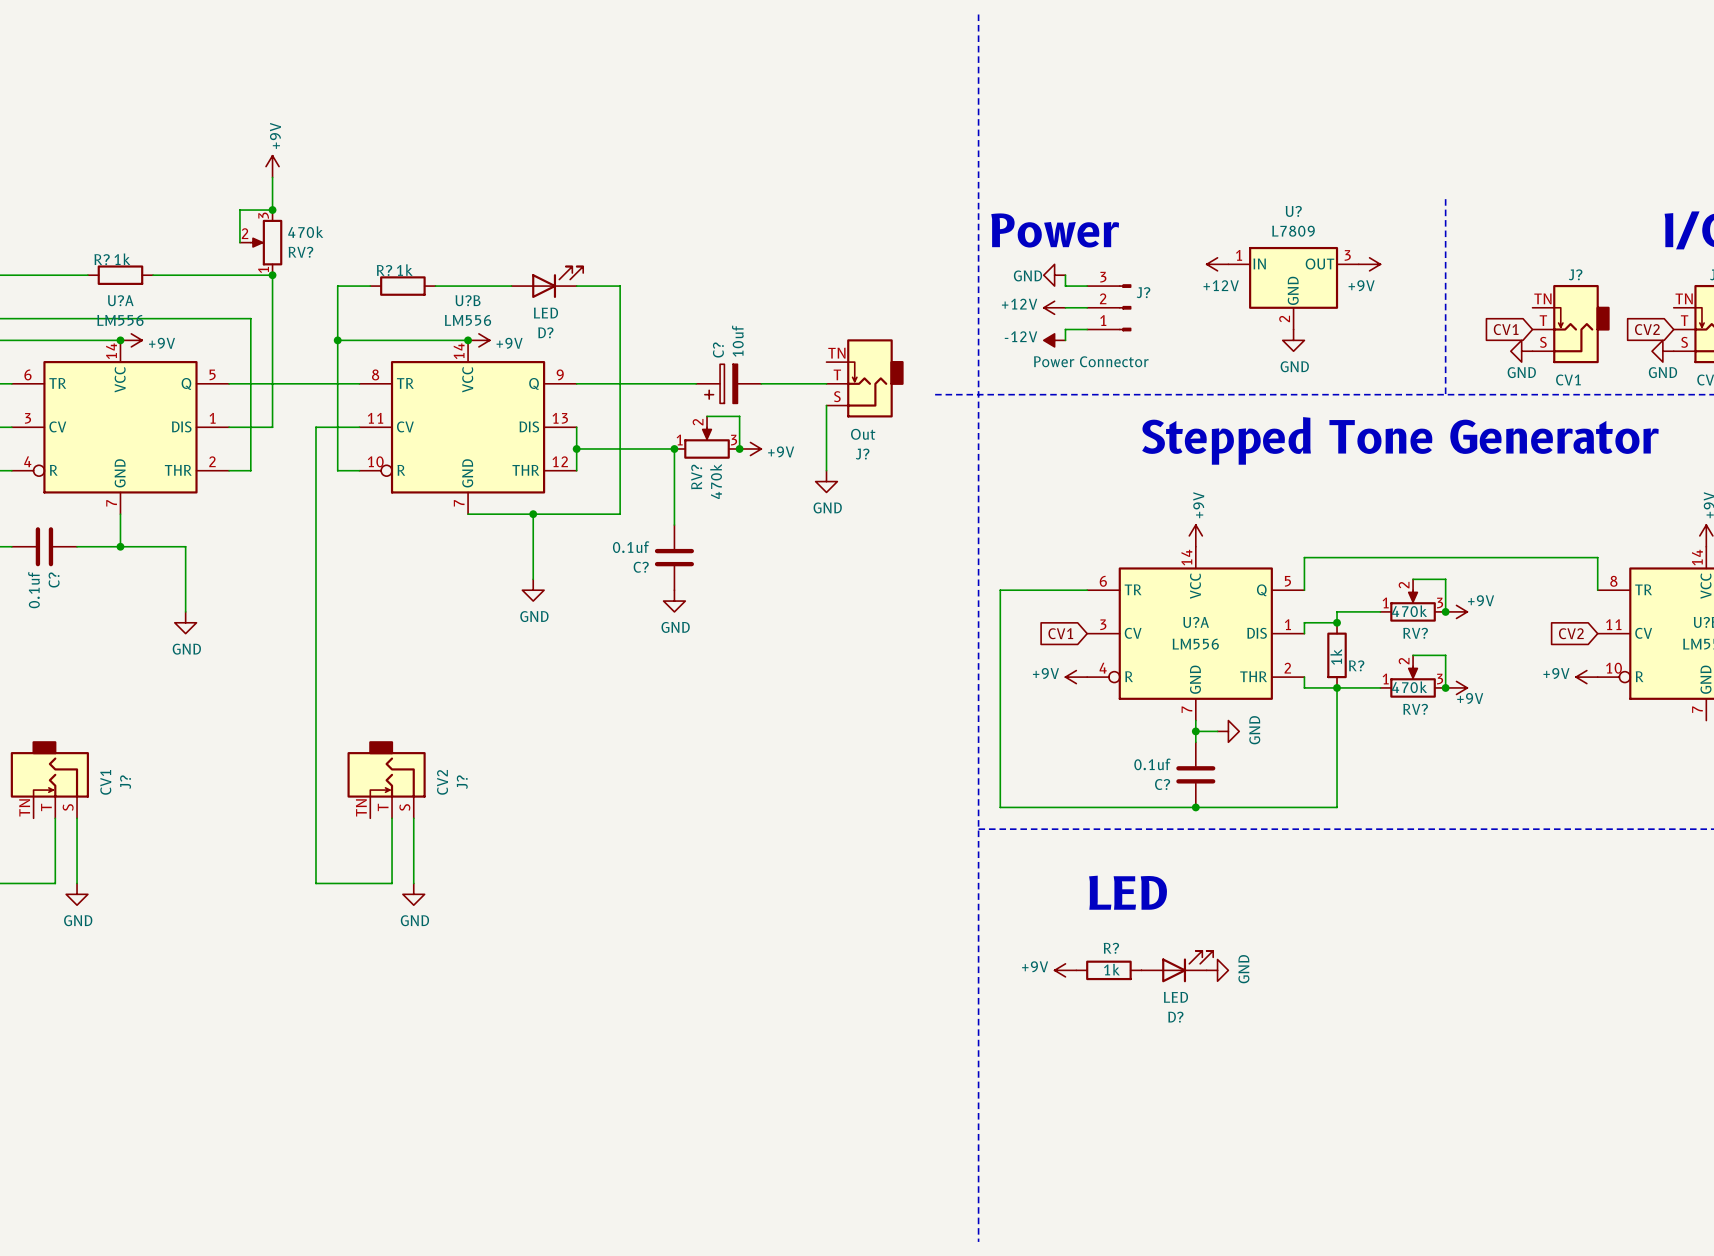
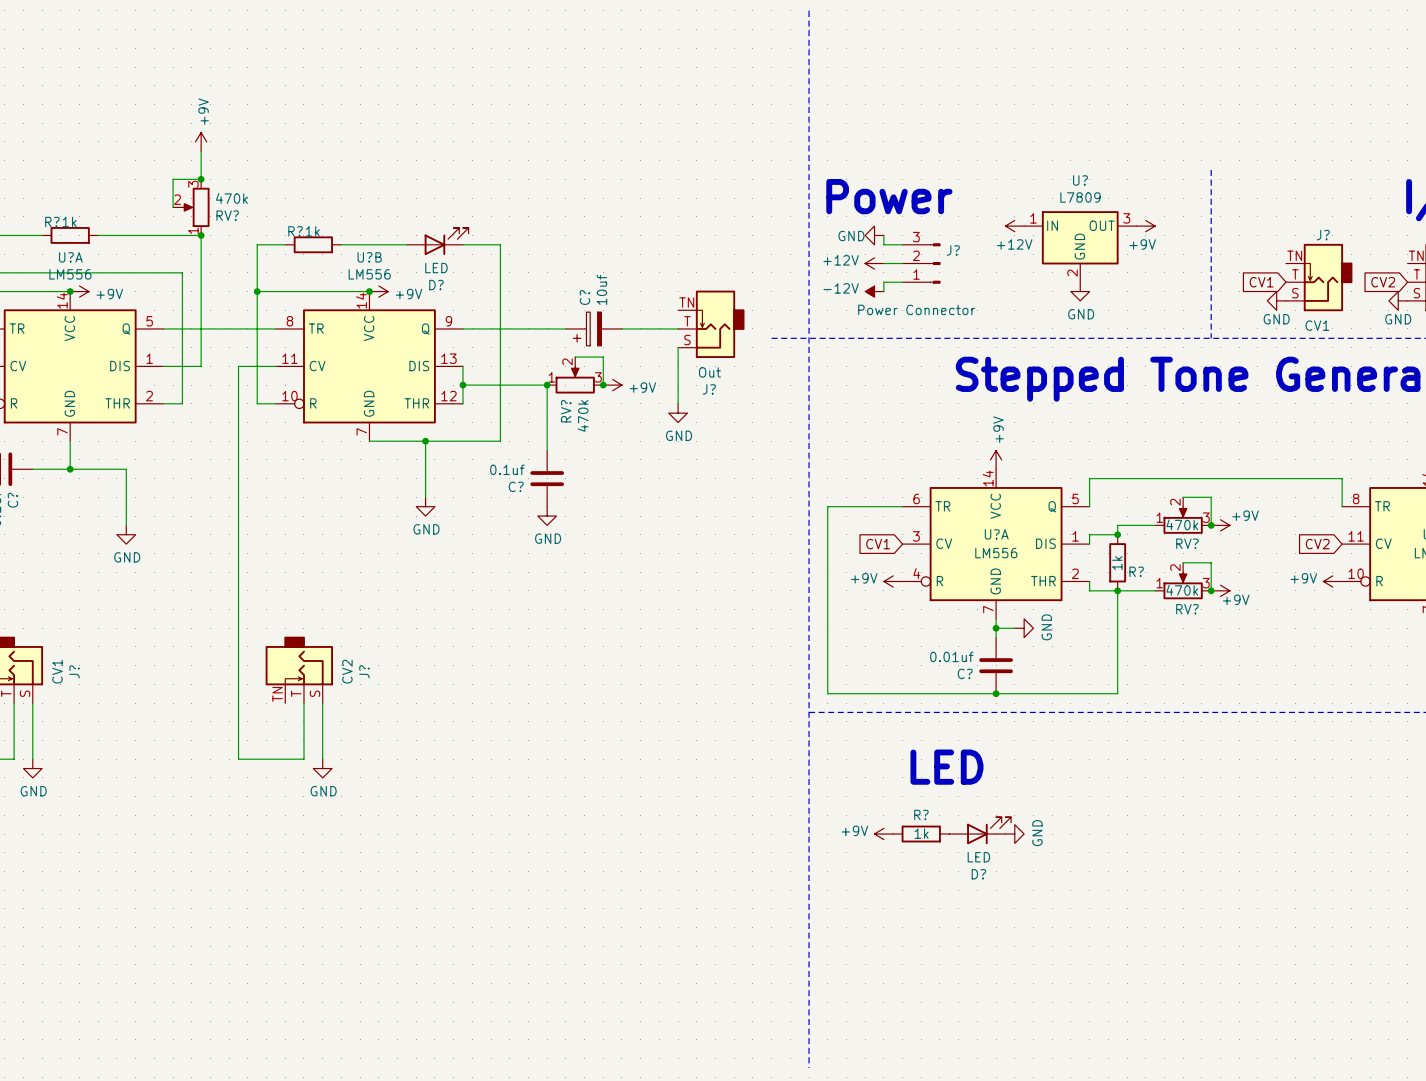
C? value: 0.1uf (1152, 764) -> 0.01uf (951, 656)

